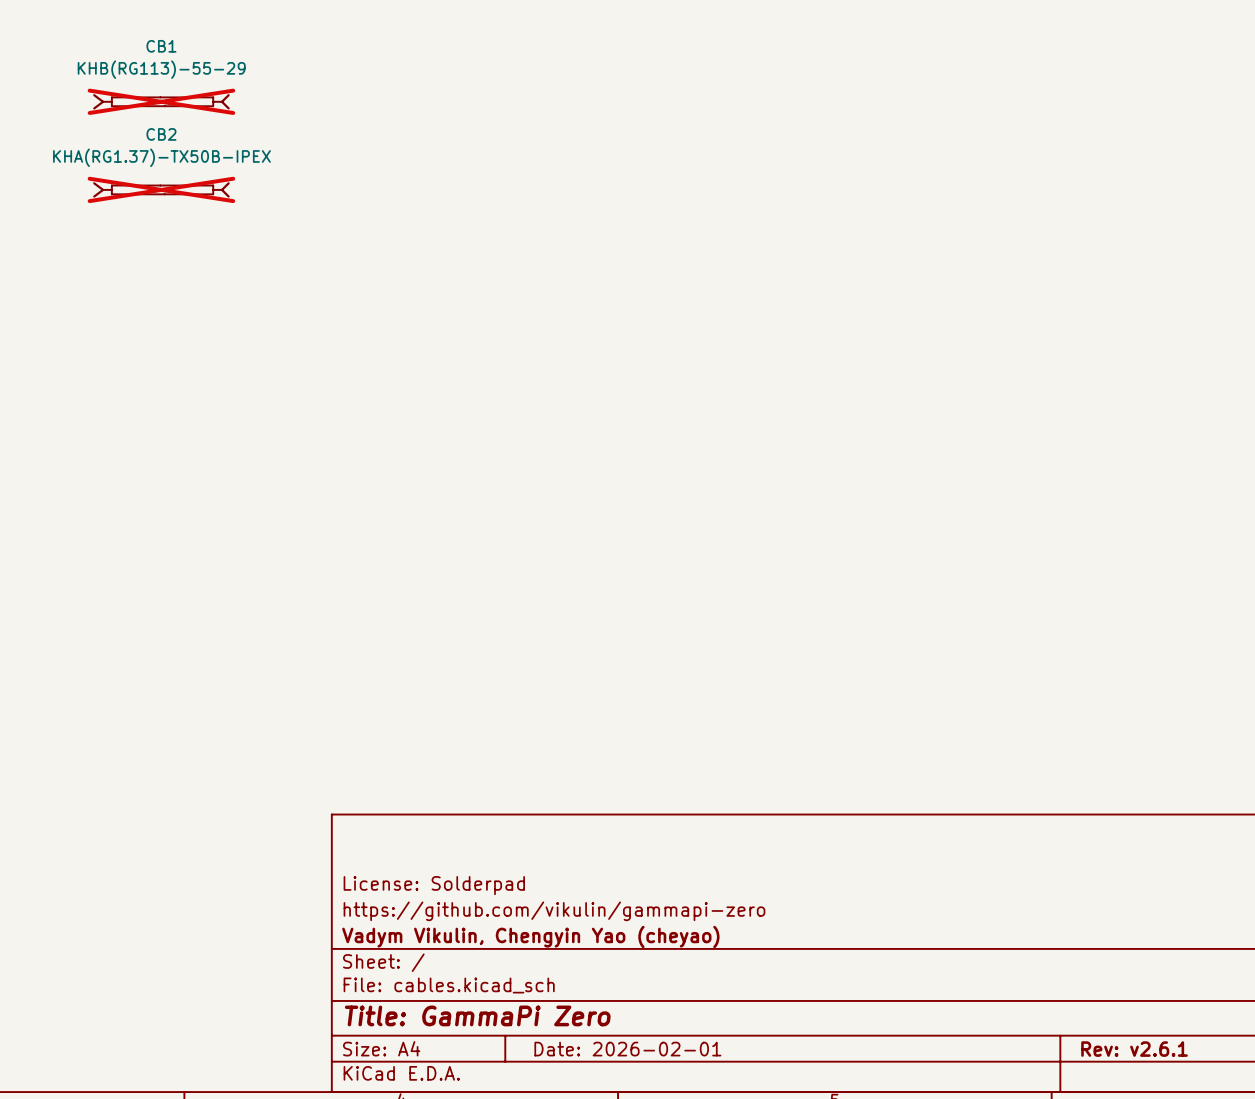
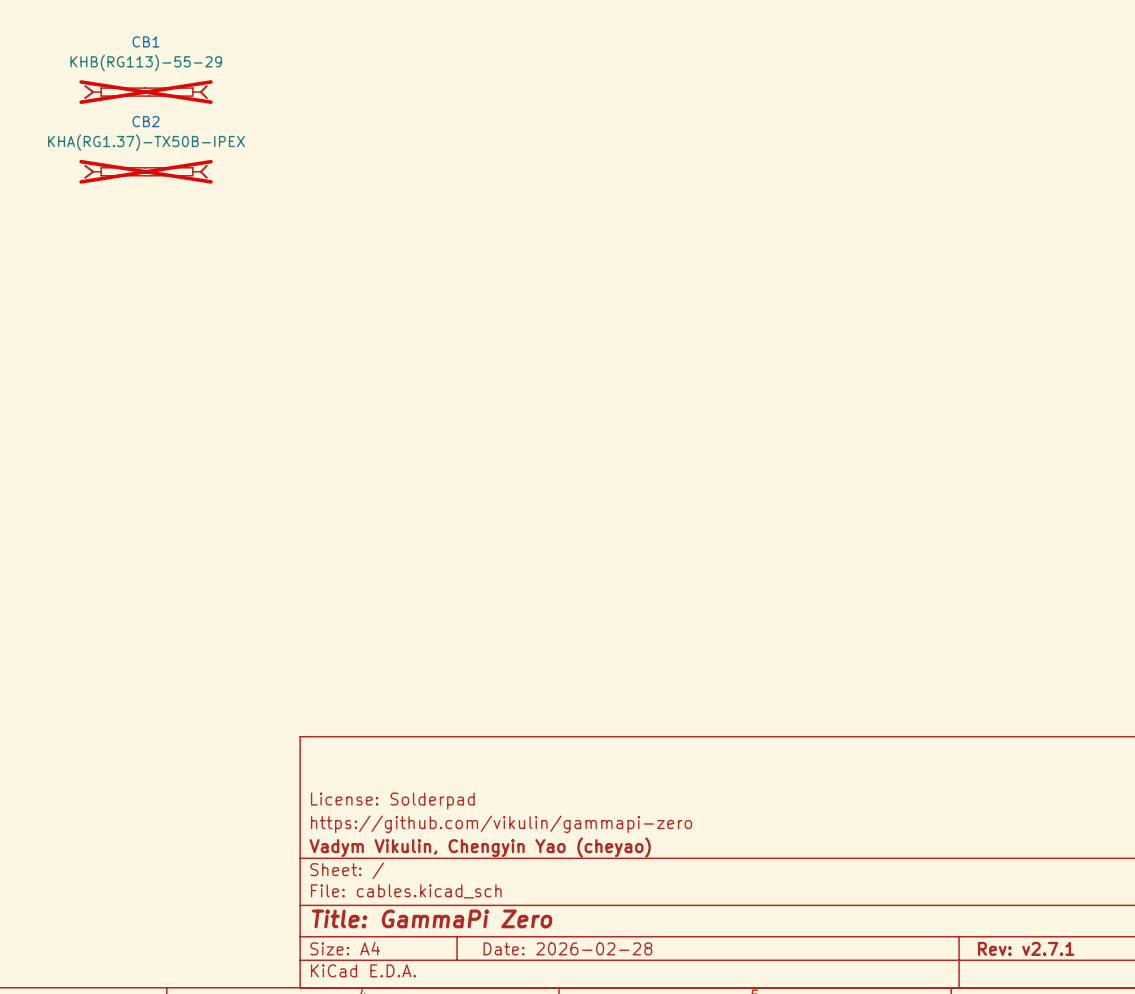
title block: Date: 2026-02-01 (627, 1049) -> Date: 2026-02-28 (567, 948)
title block: Rev: v2.6.1 (1134, 1049) -> Rev: v2.7.1 (1026, 948)

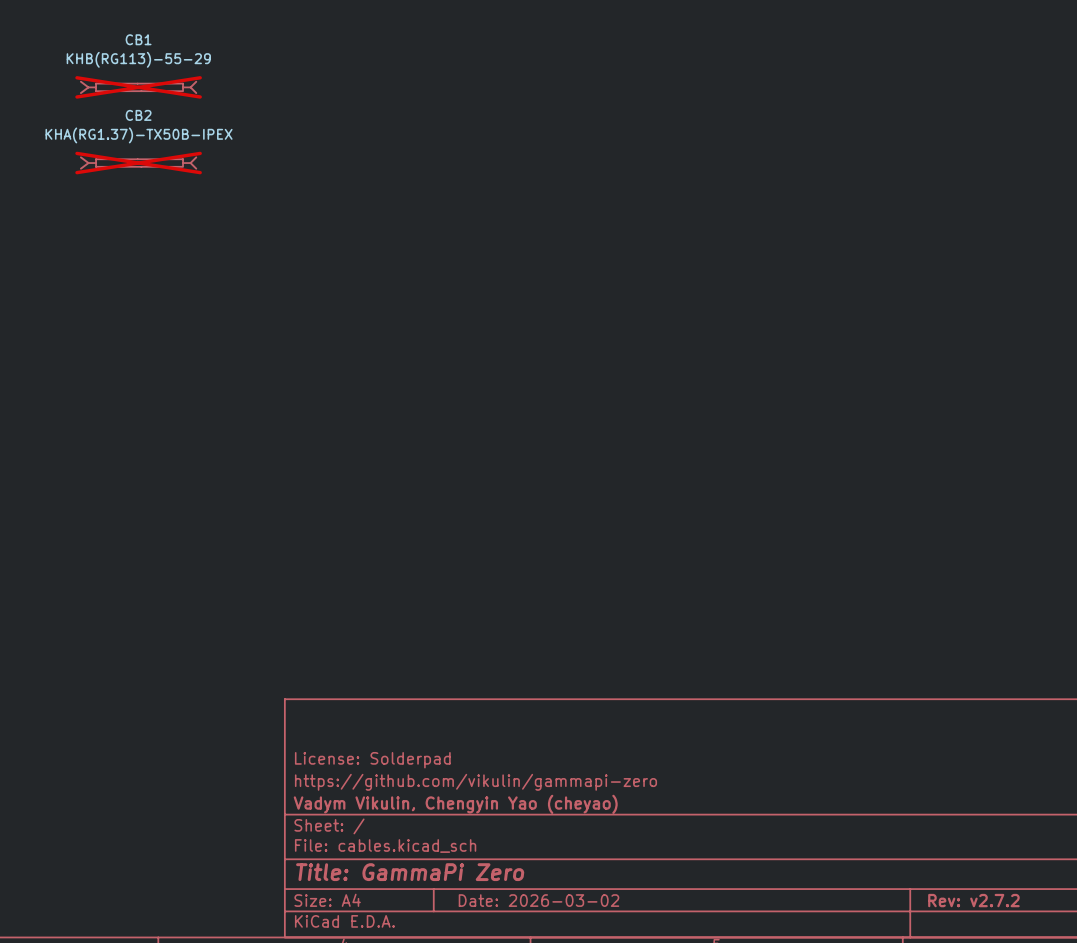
title block: Date: 2026-02-28 (567, 948) -> Date: 2026-03-02 (539, 900)
title block: Rev: v2.7.1 (1026, 948) -> Rev: v2.7.2 (973, 900)

